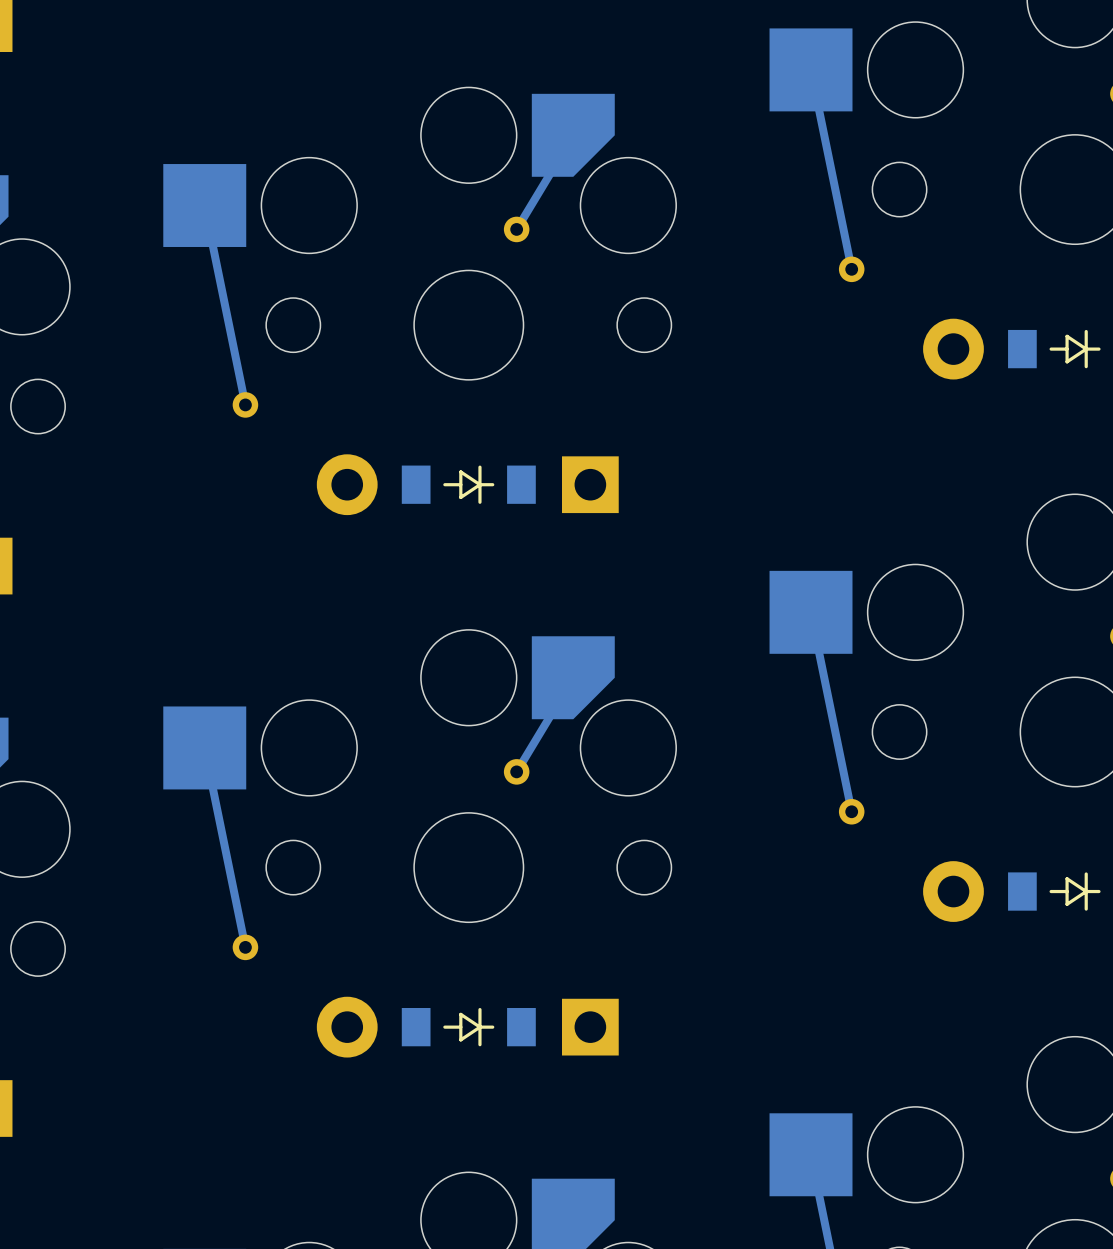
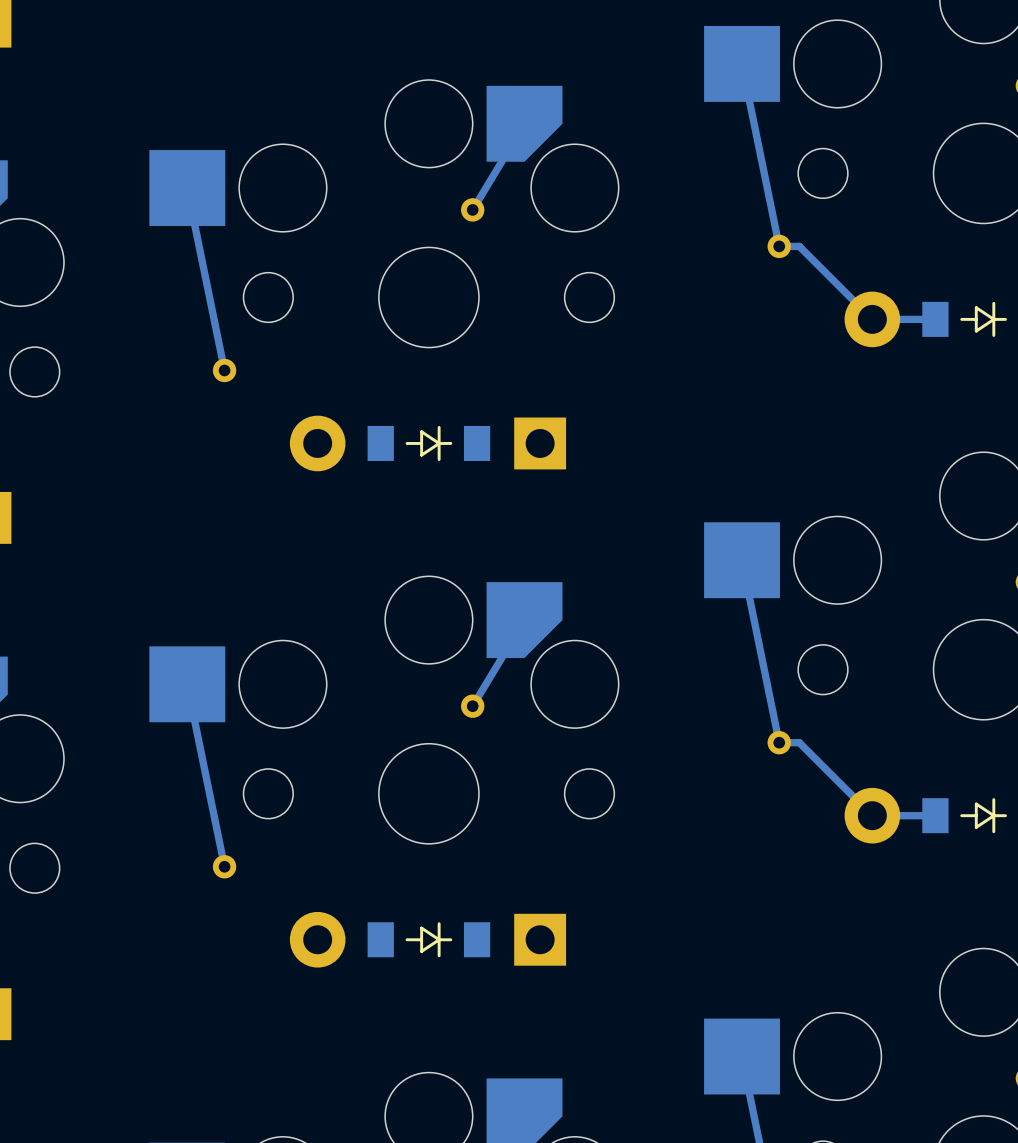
track: none -> (779, 246) (799, 246) (872, 319) (935, 319)
track: none -> (779, 742) (799, 742) (872, 815) (935, 815)

